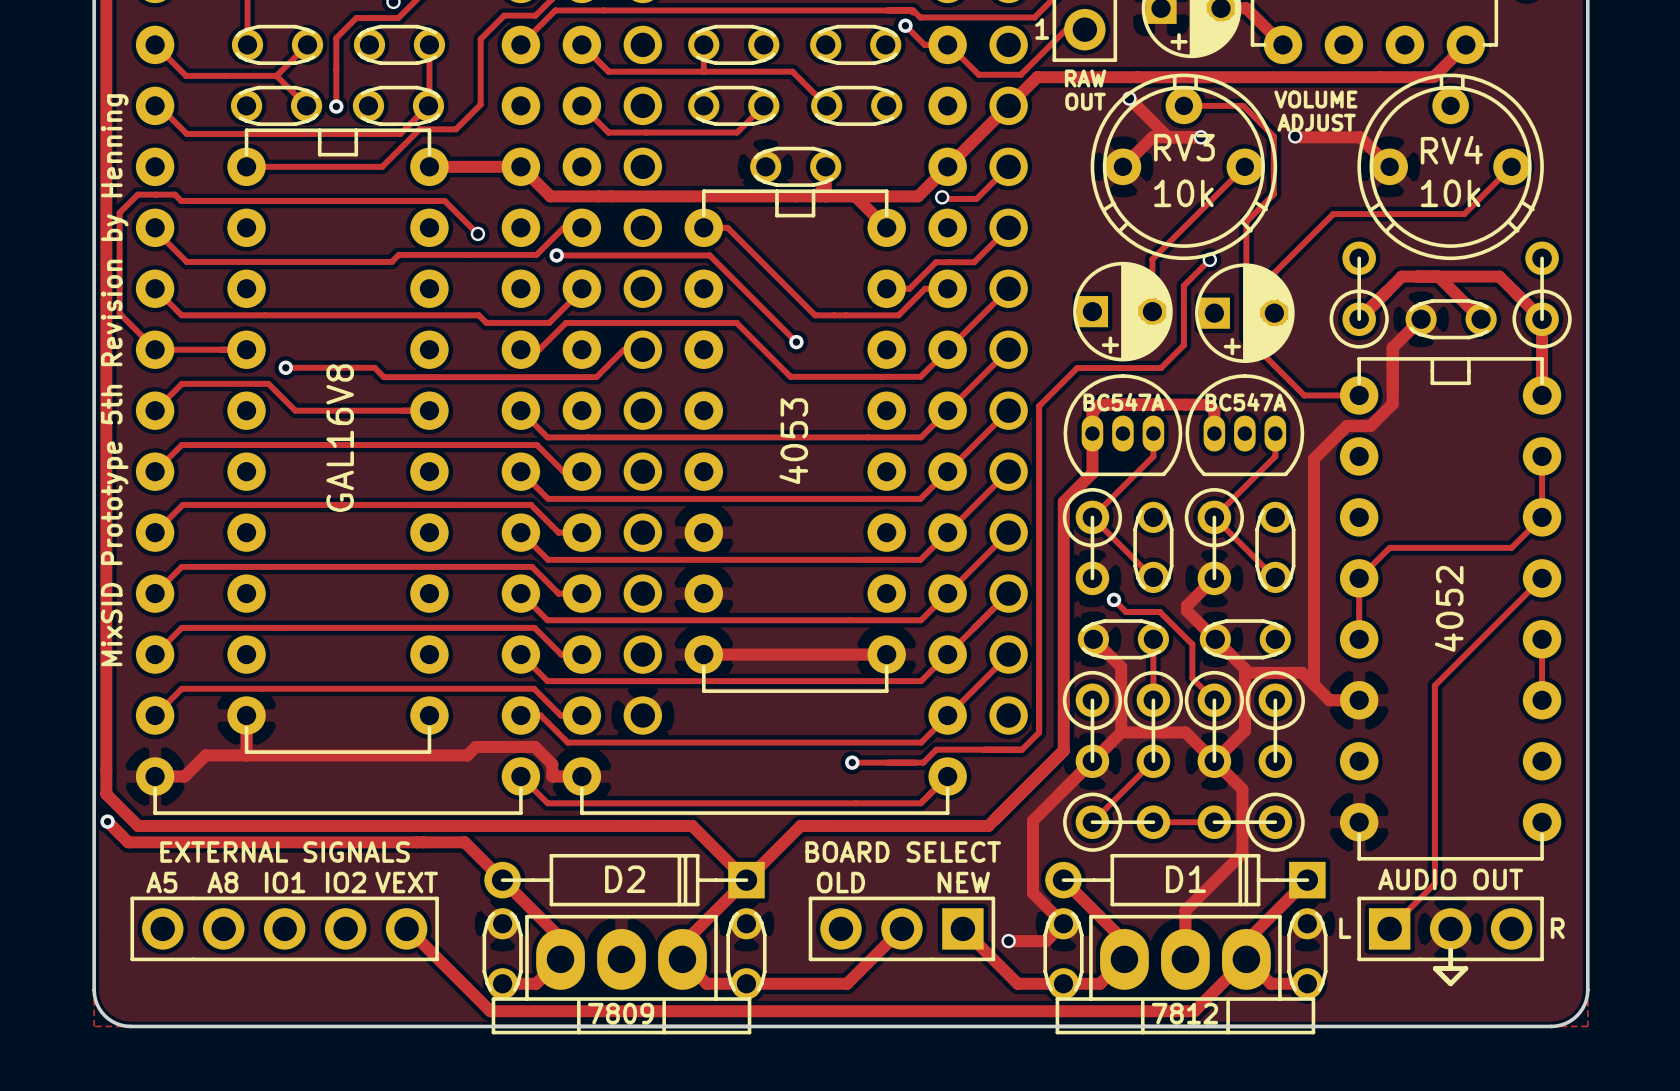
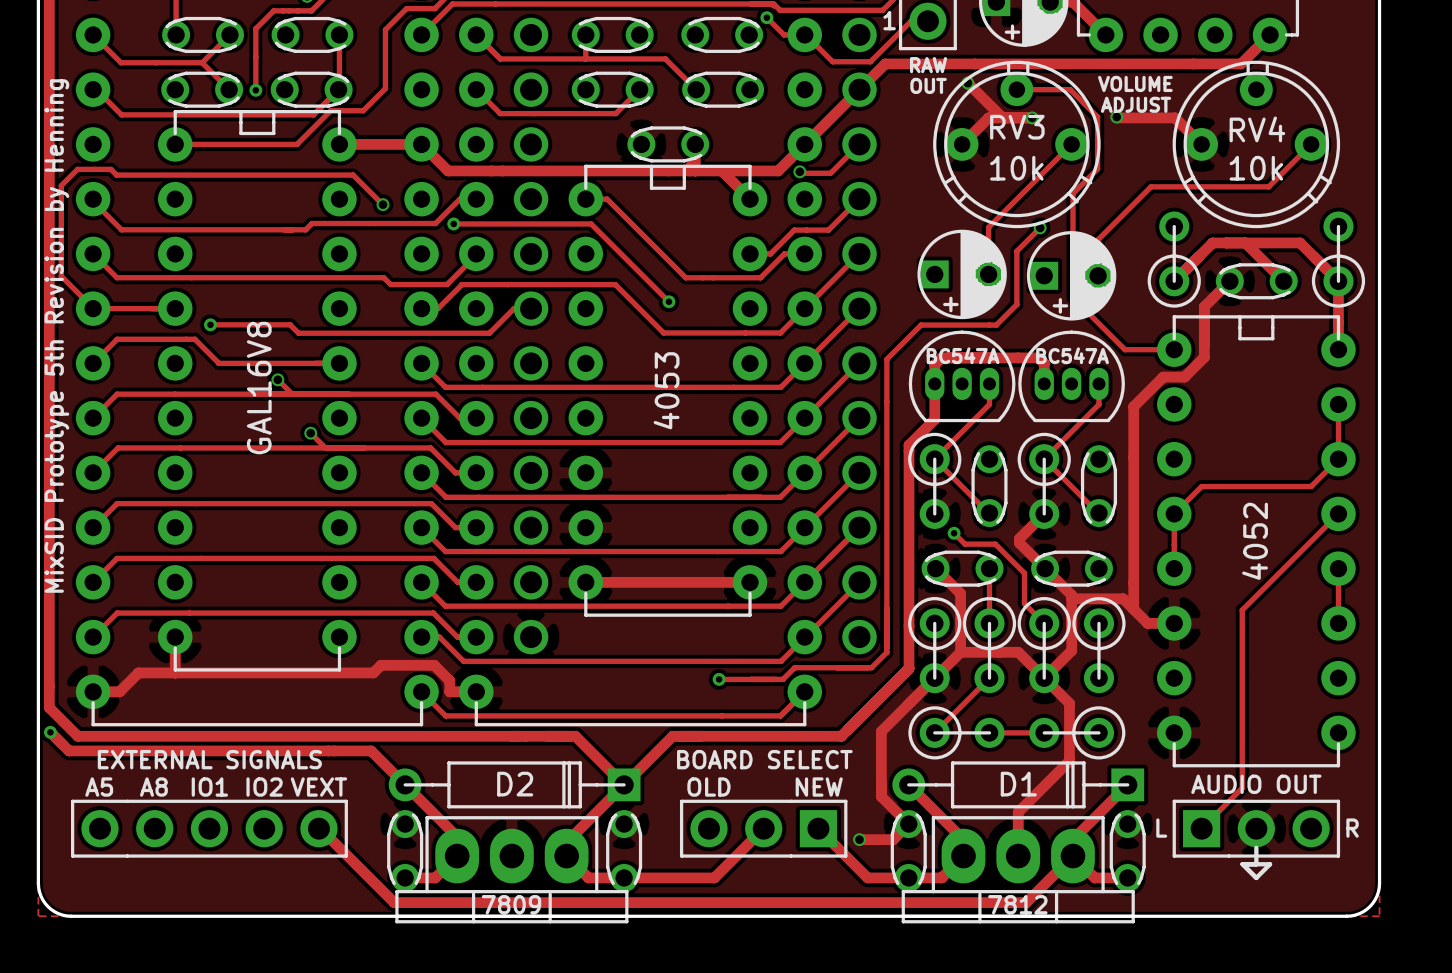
track: none -> (277, 379) (292, 394)
via: none -> (277, 379)
track: none -> (310, 433) (325, 447)
via: none -> (310, 433)

